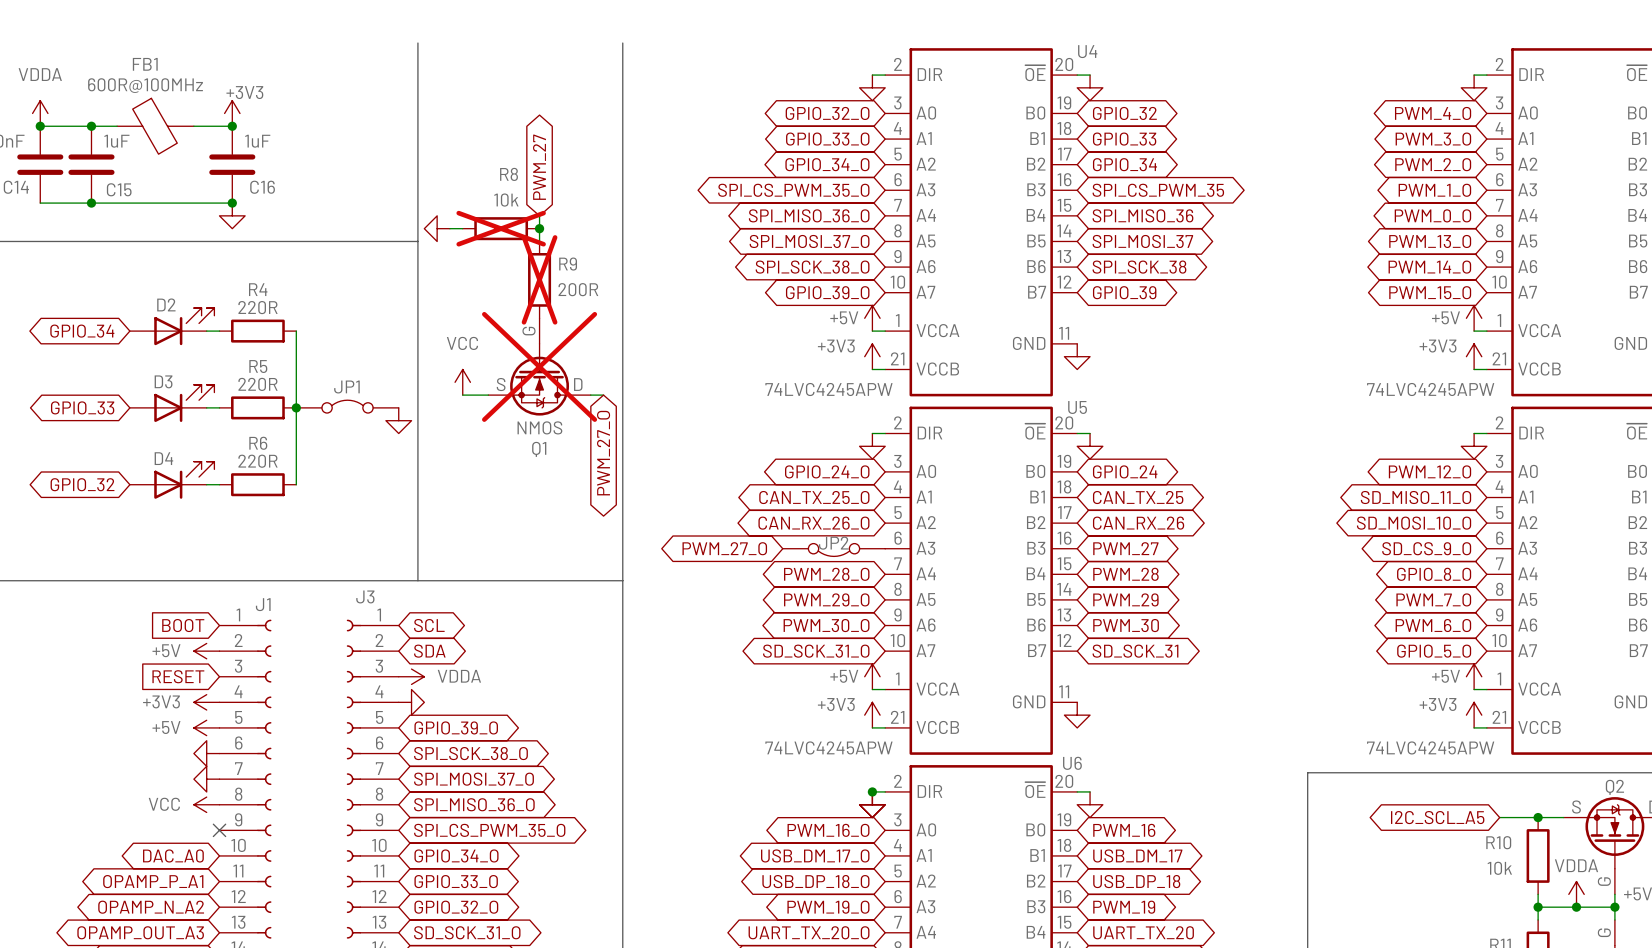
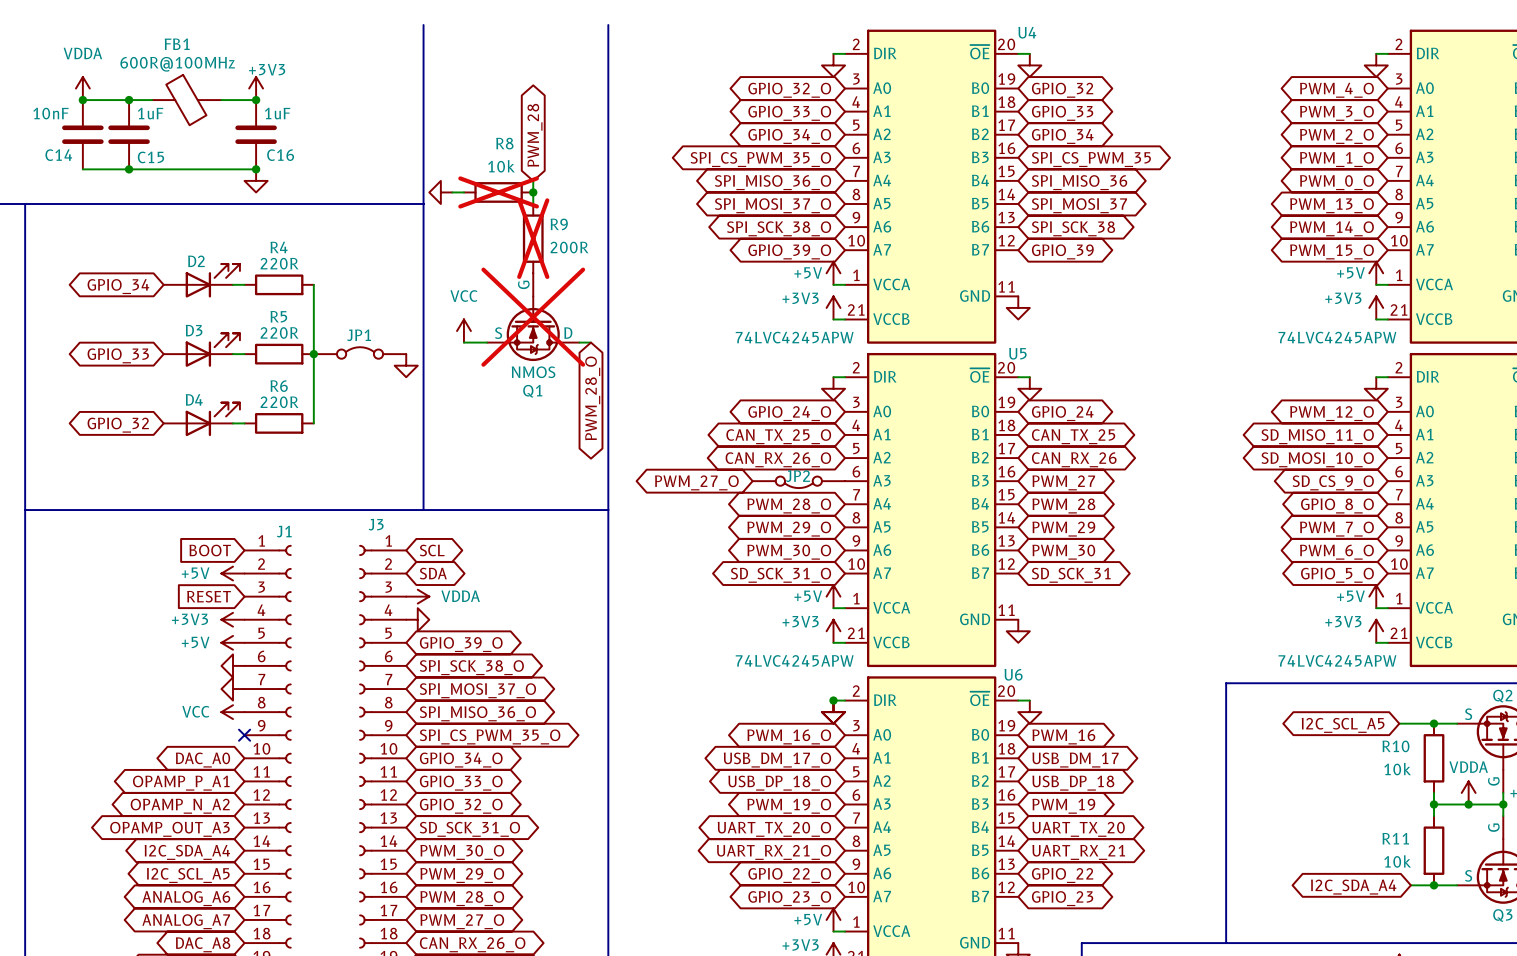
global label: PWM_27 (539, 167) -> PWM_28 (534, 135)
global label: PWM_27_O (603, 453) -> PWM_28_O (592, 398)

